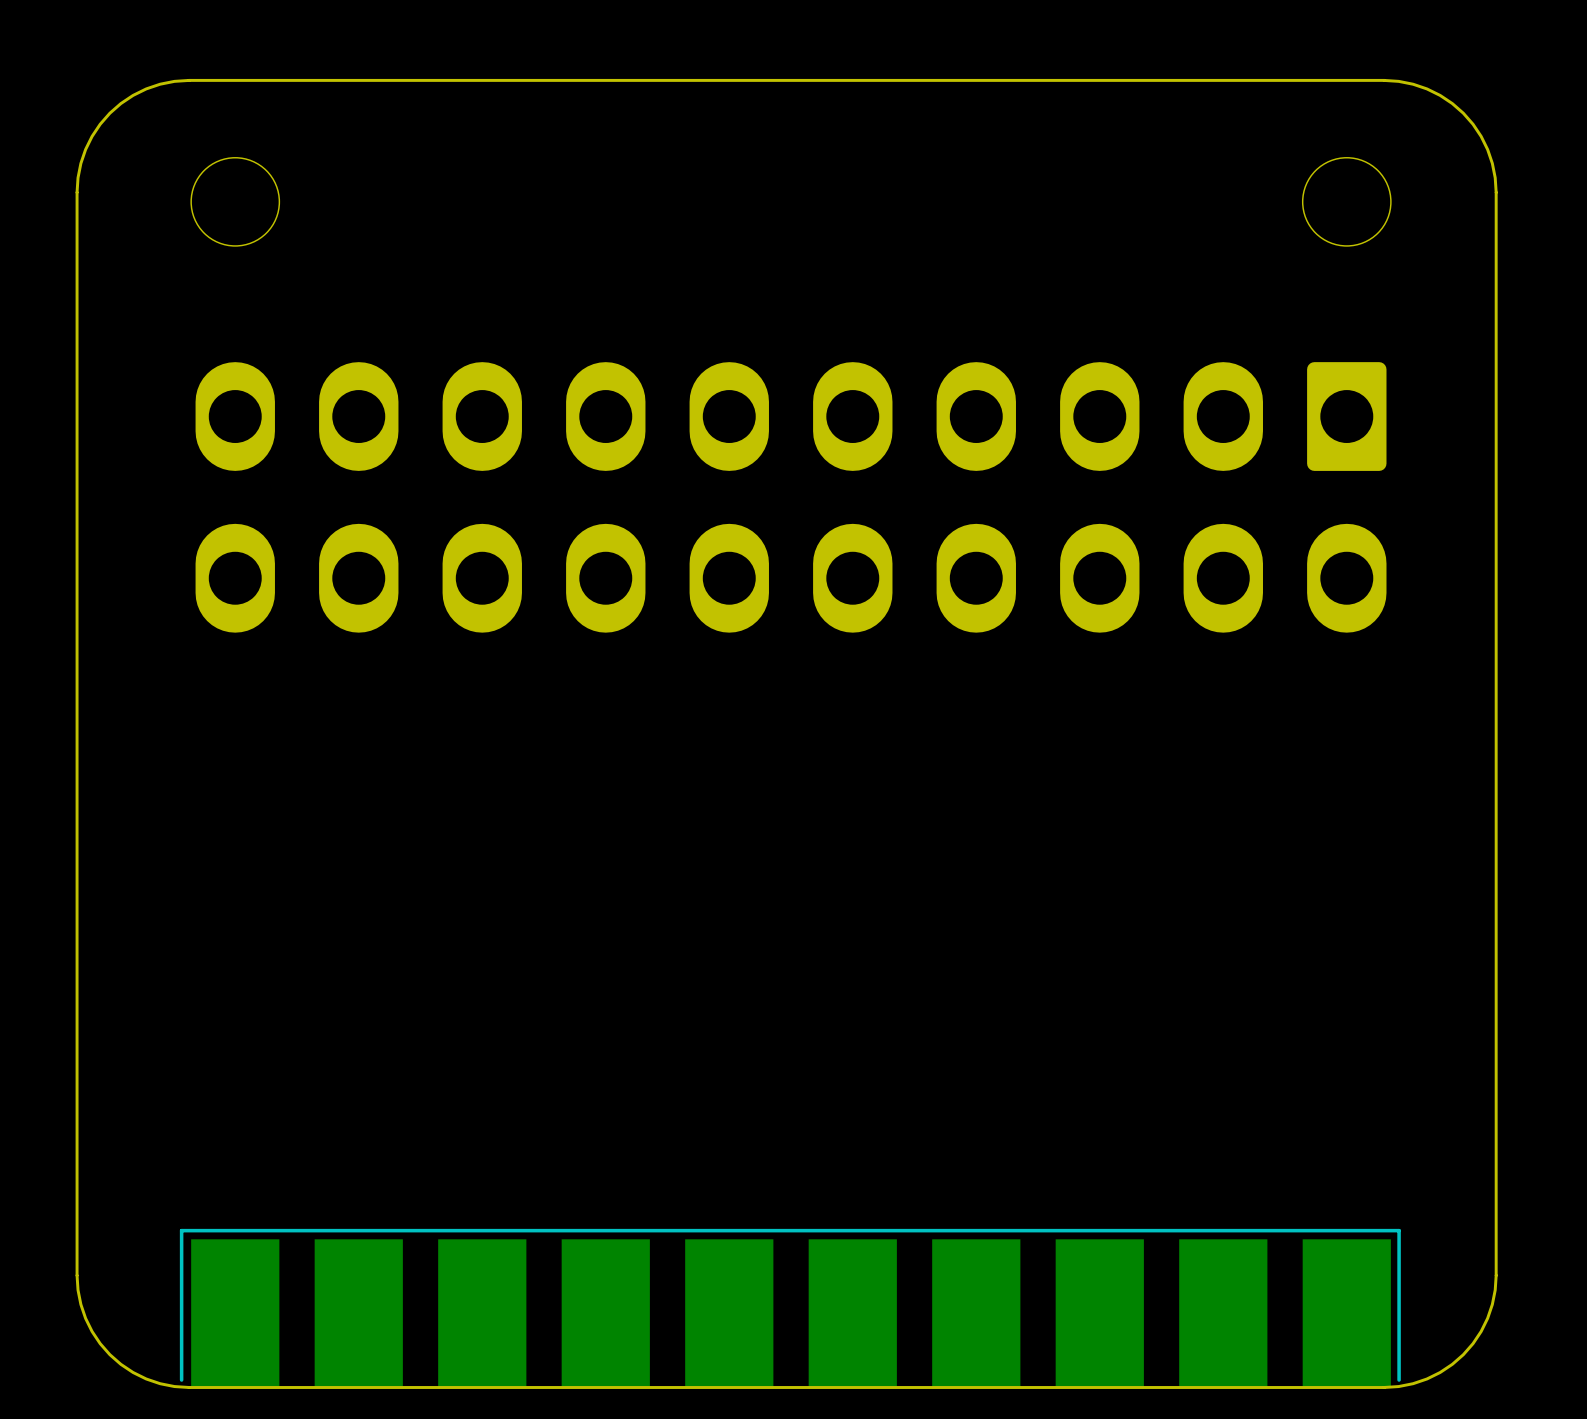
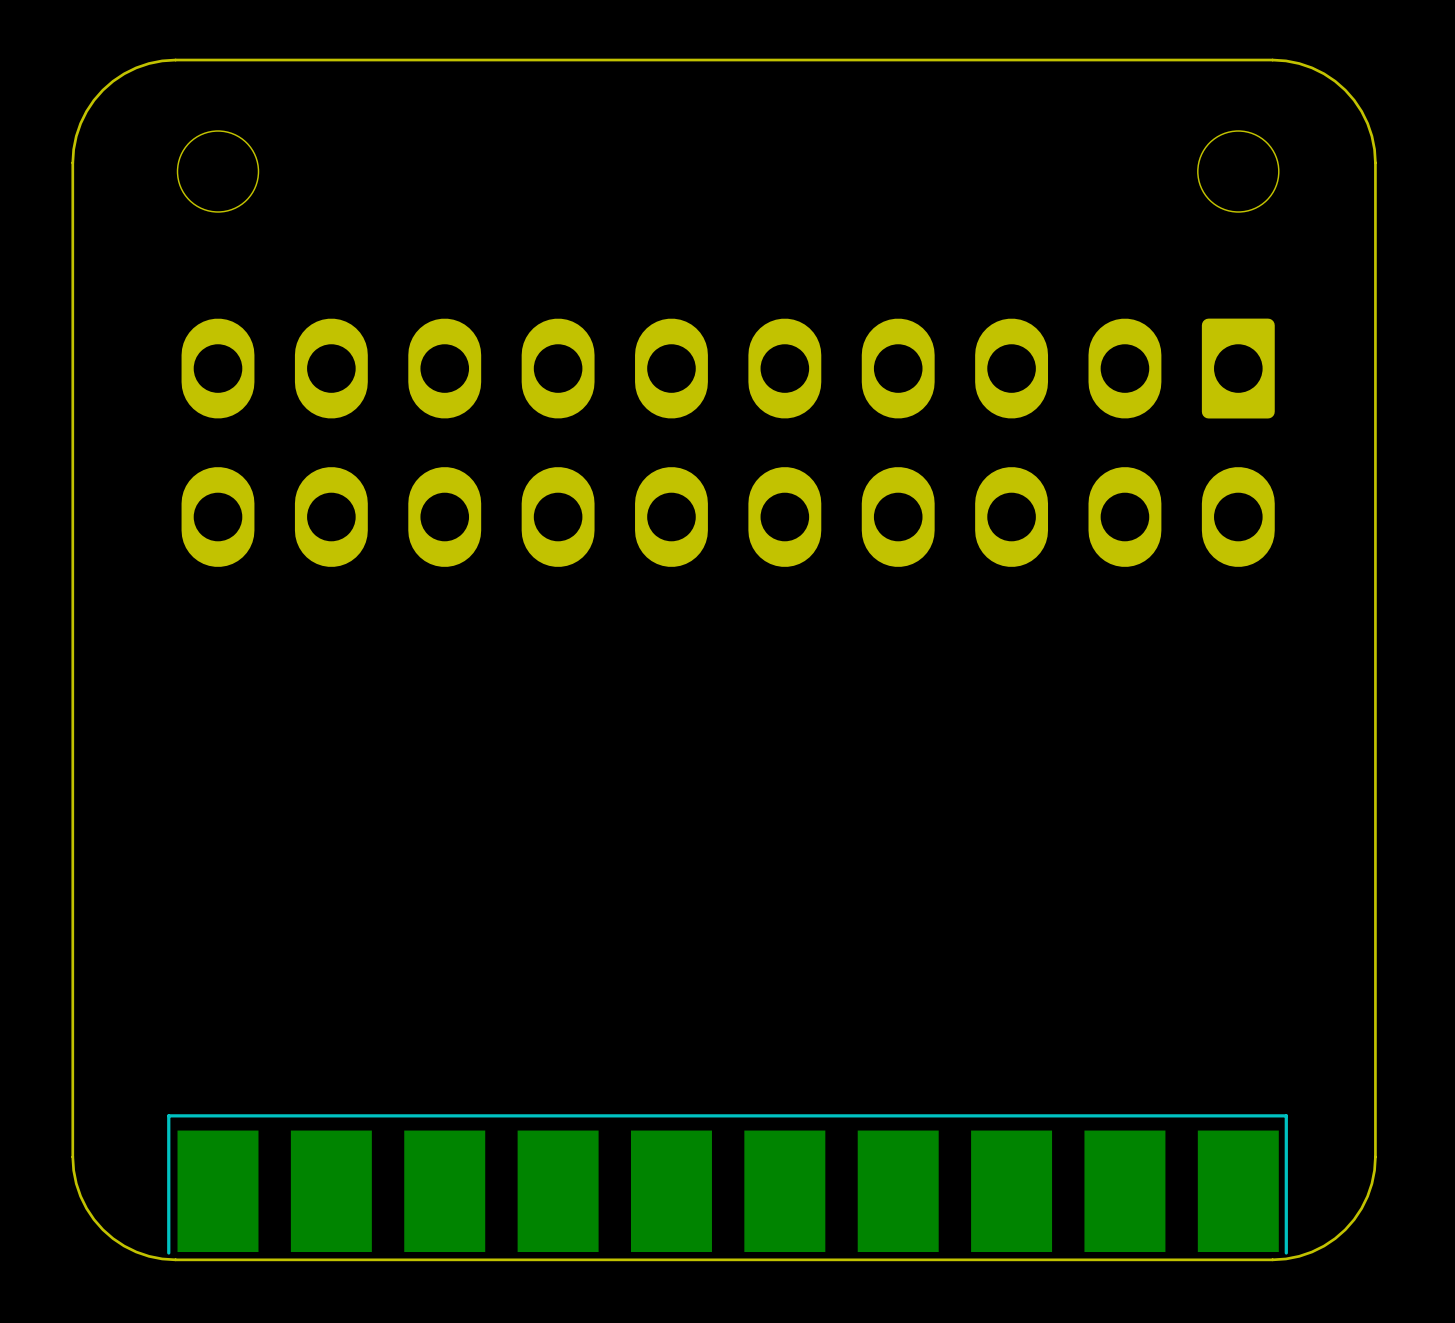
part footprint: [179, 1228, 1401, 1387] -> [167, 1114, 1288, 1255]

